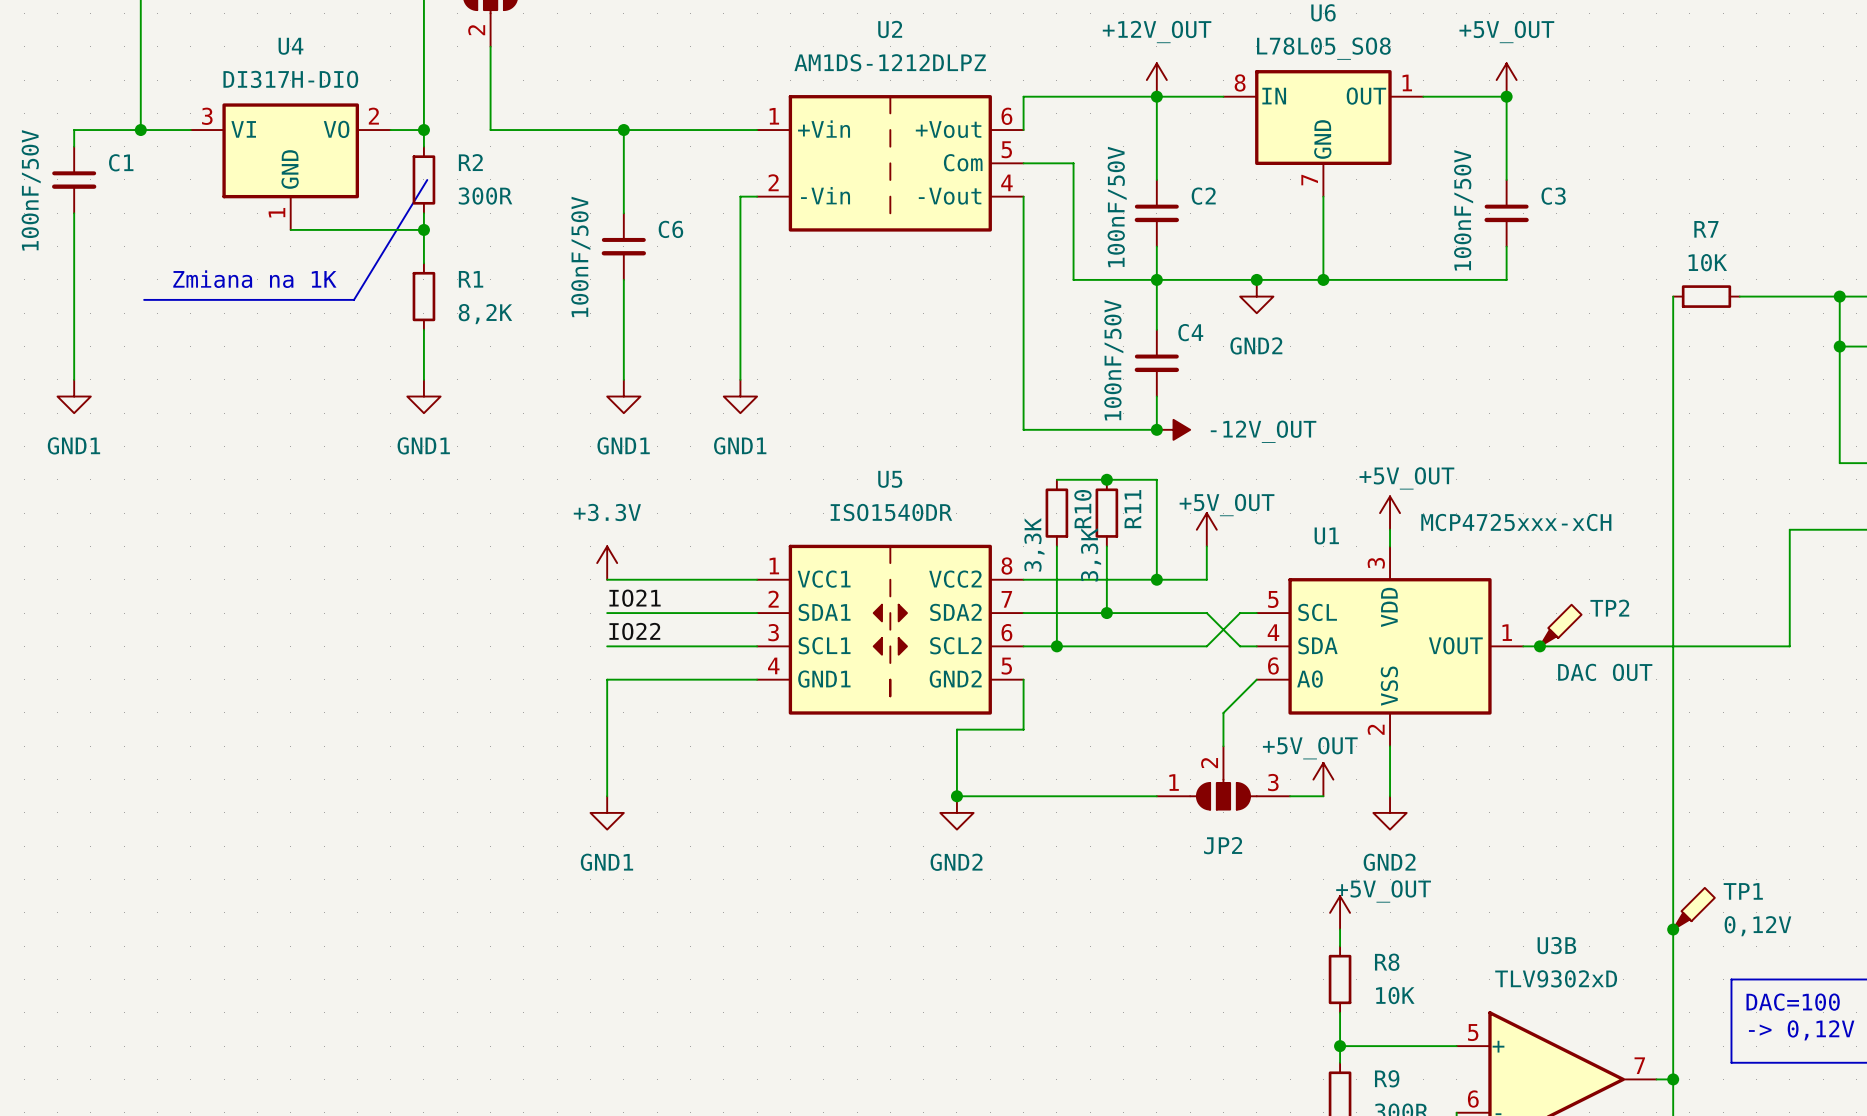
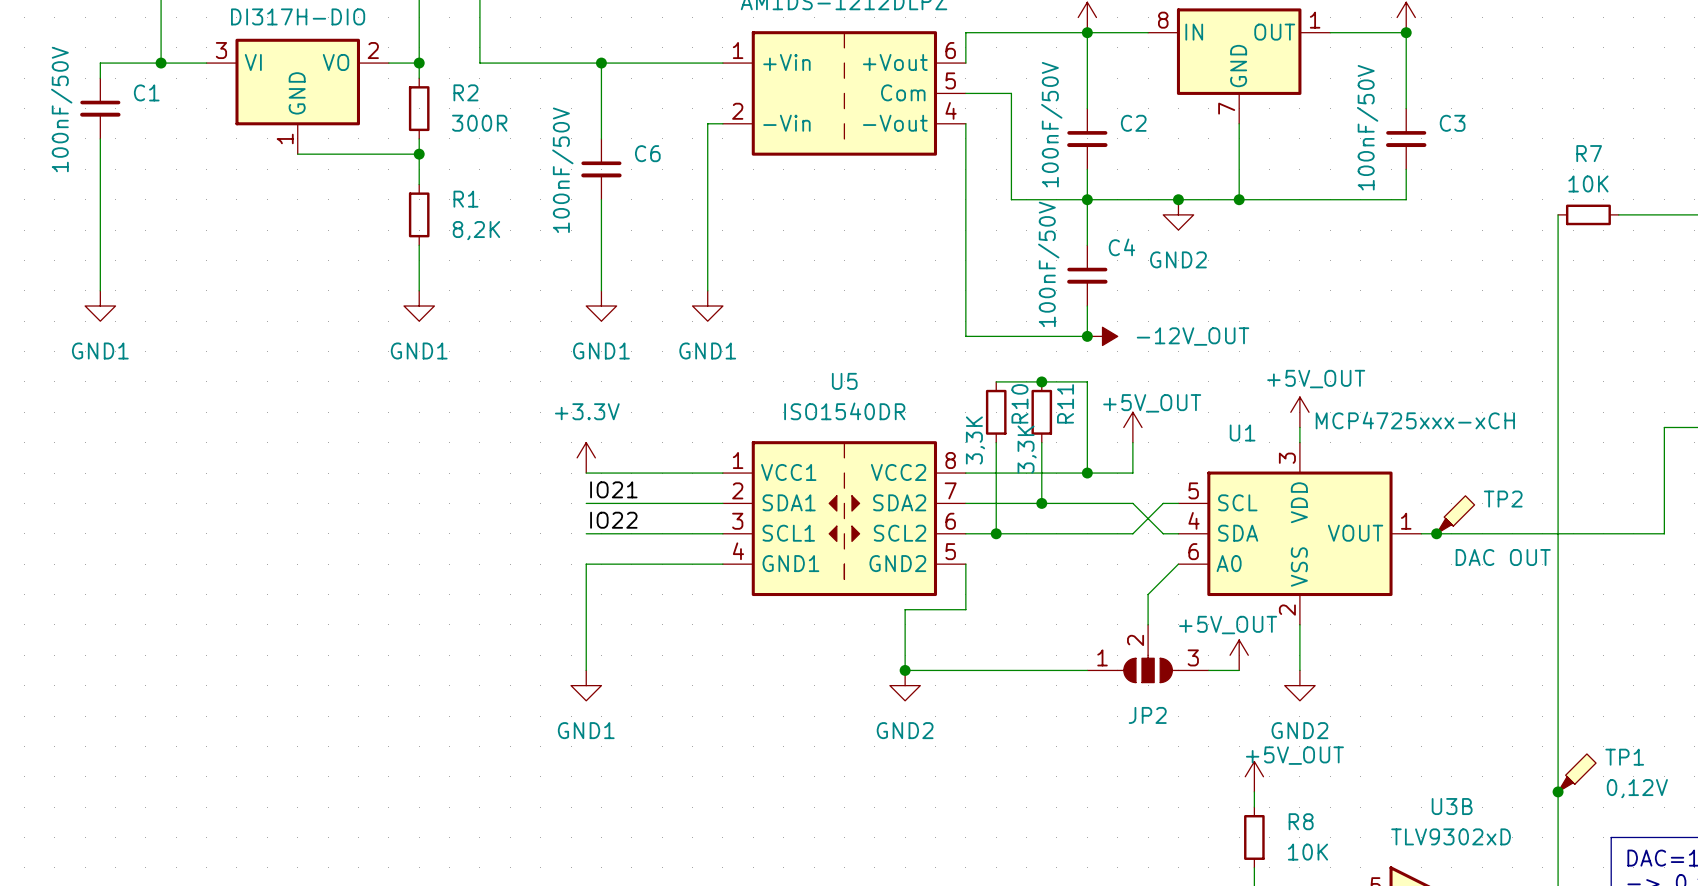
line: (427, 179) (354, 299) (144, 299) -> none
text: Zmiana na 1K (254, 279) -> none

